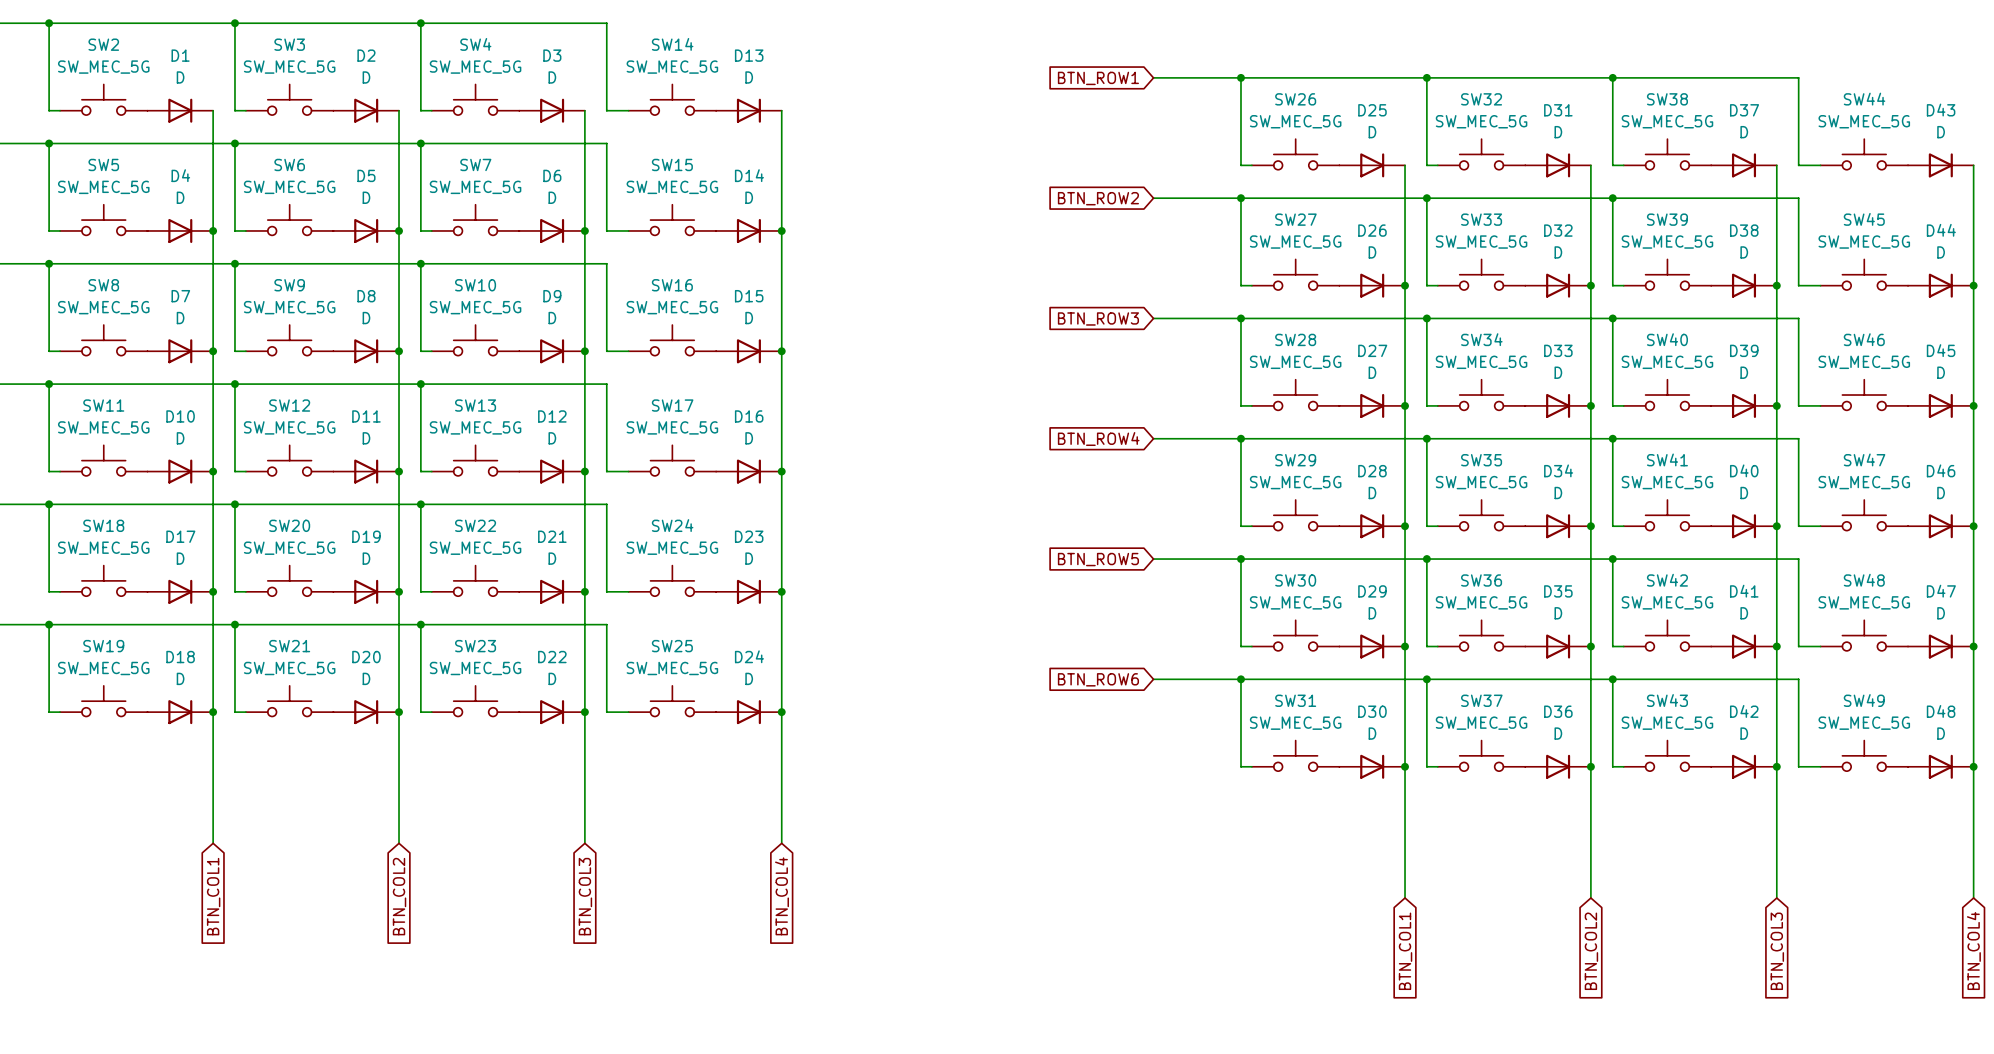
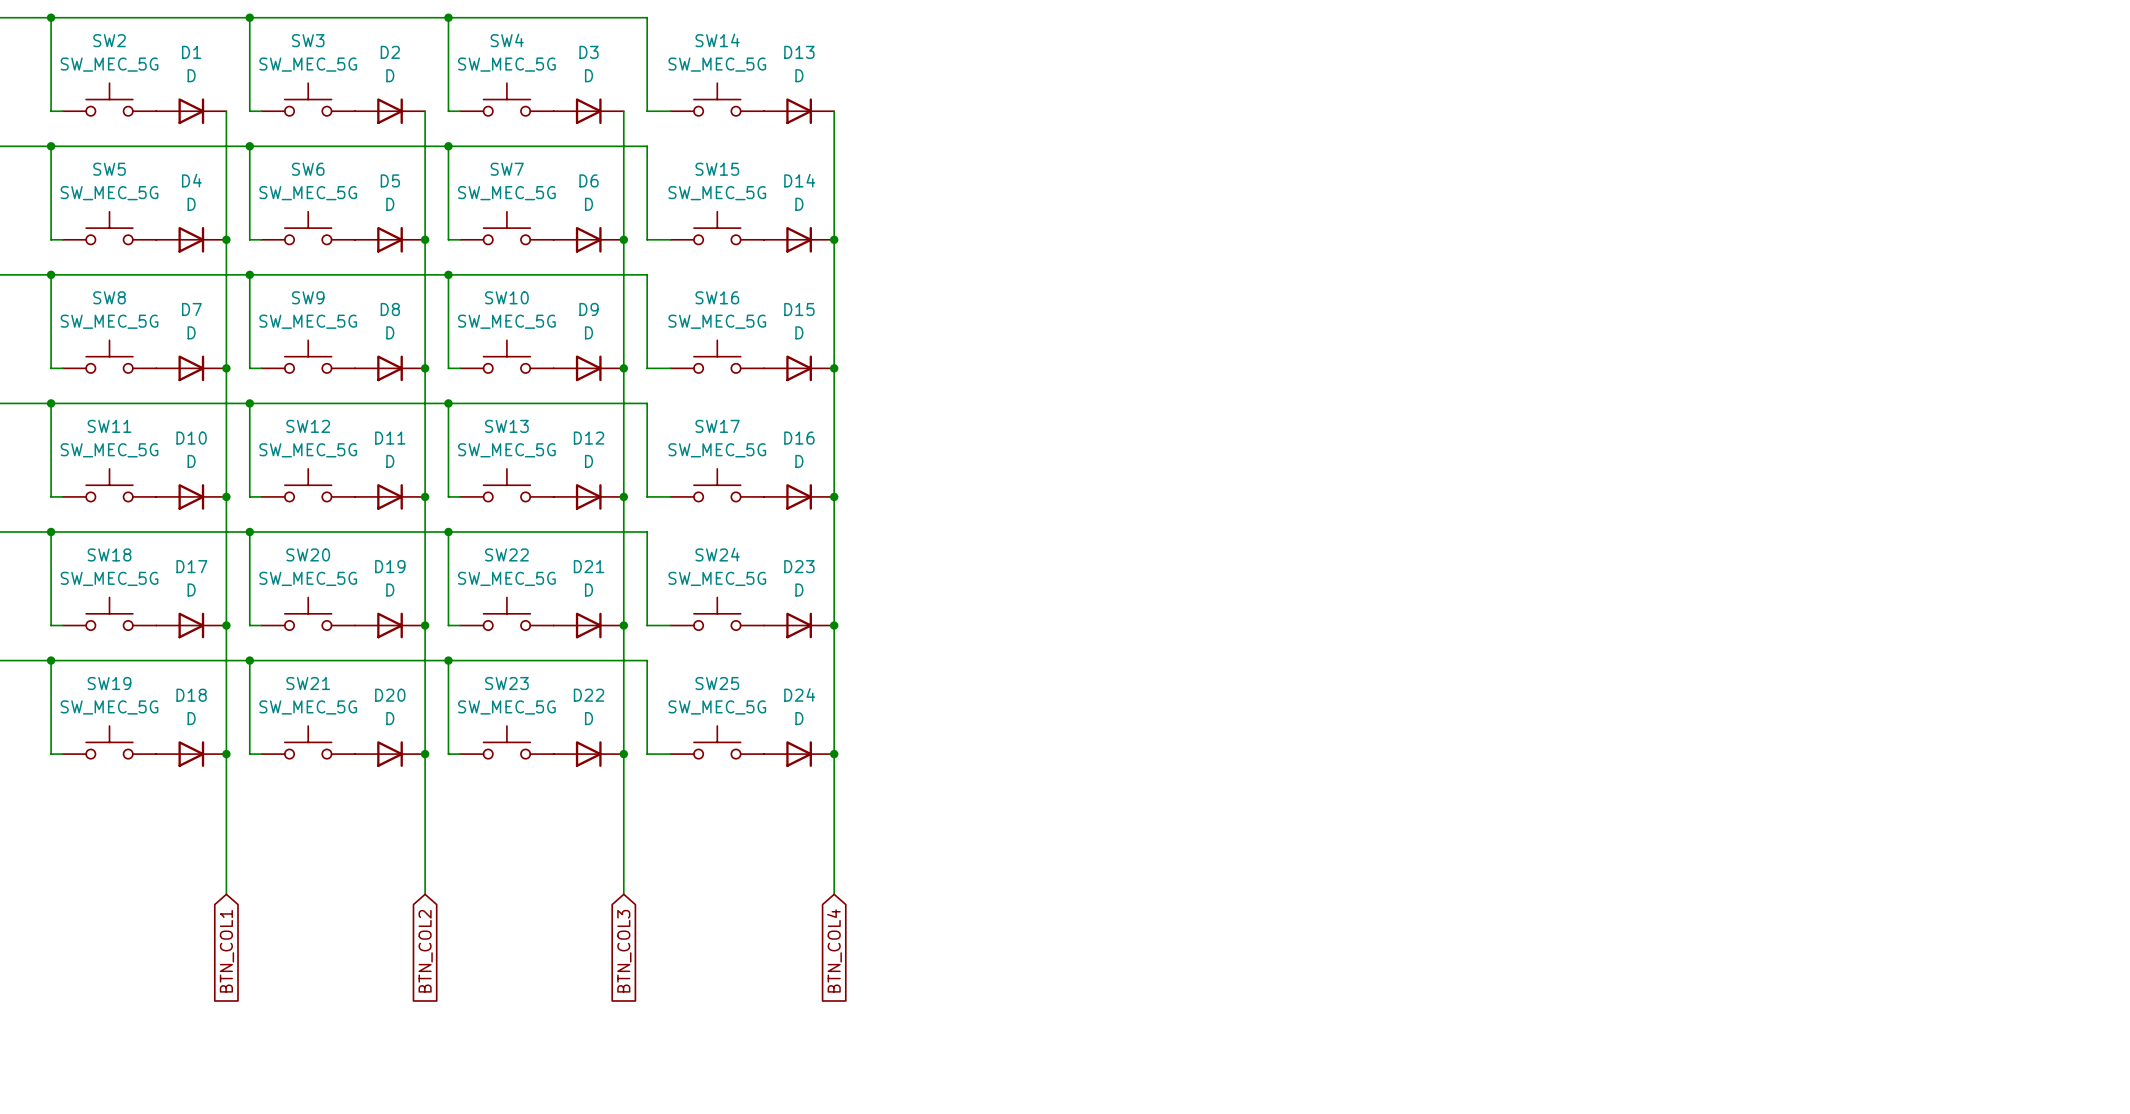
wire: (1153, 77) (1798, 77) (1798, 165) (1820, 165) -> none
wire: (1240, 77) (1240, 165) (1251, 165) -> none
junction: (1240, 77) -> none
wire: (1426, 77) (1426, 165) (1437, 165) -> none
junction: (1426, 77) -> none
wire: (1612, 77) (1612, 165) (1623, 165) -> none
junction: (1612, 77) -> none
global label: BTN_ROW1 (1098, 78) -> none
SW26: SW_MEC_5G (1295, 154) -> none
SW32: SW_MEC_5G (1481, 154) -> none
SW38: SW_MEC_5G (1667, 154) -> none
SW44: SW_MEC_5G (1864, 154) -> none
D25: D (1372, 165) -> none
wire: (1405, 165) (1405, 898) -> none
D31: D (1558, 165) -> none
wire: (1590, 165) (1590, 898) -> none
D37: D (1743, 165) -> none
wire: (1776, 165) (1776, 898) -> none
D43: D (1940, 165) -> none
wire: (1973, 165) (1973, 898) -> none
global label: BTN_ROW2 (1098, 198) -> none
wire: (1153, 198) (1798, 198) (1798, 285) (1820, 285) -> none
wire: (1240, 198) (1240, 285) (1251, 285) -> none
junction: (1240, 198) -> none
wire: (1426, 198) (1426, 285) (1437, 285) -> none
junction: (1426, 198) -> none
wire: (1612, 198) (1612, 285) (1623, 285) -> none
junction: (1612, 198) -> none
SW27: SW_MEC_5G (1295, 274) -> none
SW33: SW_MEC_5G (1481, 274) -> none
SW39: SW_MEC_5G (1667, 274) -> none
SW45: SW_MEC_5G (1864, 274) -> none
D26: D (1372, 285) -> none
junction: (1405, 285) -> none
D32: D (1558, 285) -> none
junction: (1590, 285) -> none
D38: D (1743, 285) -> none
junction: (1776, 285) -> none
D44: D (1940, 285) -> none
junction: (1973, 285) -> none
global label: BTN_ROW3 (1098, 318) -> none
wire: (1153, 318) (1798, 318) (1798, 405) (1820, 405) -> none
wire: (1240, 318) (1240, 405) (1251, 405) -> none
junction: (1240, 318) -> none
wire: (1426, 318) (1426, 405) (1437, 405) -> none
junction: (1426, 318) -> none
wire: (1612, 318) (1612, 405) (1623, 405) -> none
junction: (1612, 318) -> none
SW28: SW_MEC_5G (1295, 395) -> none
SW34: SW_MEC_5G (1481, 395) -> none
SW40: SW_MEC_5G (1667, 395) -> none
SW46: SW_MEC_5G (1864, 395) -> none
D27: D (1372, 405) -> none
junction: (1405, 405) -> none
D33: D (1558, 405) -> none
junction: (1590, 405) -> none
D39: D (1743, 405) -> none
junction: (1776, 405) -> none
D45: D (1940, 405) -> none
junction: (1973, 405) -> none
wire: (1153, 438) (1798, 438) (1798, 526) (1820, 526) -> none
wire: (1240, 438) (1240, 526) (1251, 526) -> none
junction: (1240, 438) -> none
wire: (1426, 438) (1426, 526) (1437, 526) -> none
junction: (1426, 438) -> none
wire: (1612, 438) (1612, 526) (1623, 526) -> none
junction: (1612, 438) -> none
global label: BTN_ROW4 (1098, 439) -> none
SW29: SW_MEC_5G (1295, 515) -> none
SW35: SW_MEC_5G (1481, 515) -> none
SW41: SW_MEC_5G (1667, 515) -> none
SW47: SW_MEC_5G (1864, 515) -> none
D28: D (1372, 526) -> none
junction: (1405, 526) -> none
D34: D (1558, 526) -> none
junction: (1590, 526) -> none
D40: D (1743, 526) -> none
junction: (1776, 526) -> none
D46: D (1940, 526) -> none
junction: (1973, 526) -> none
global label: BTN_ROW5 (1098, 559) -> none
wire: (1153, 559) (1798, 559) (1798, 646) (1820, 646) -> none
wire: (1240, 559) (1240, 646) (1251, 646) -> none
junction: (1240, 559) -> none
wire: (1426, 559) (1426, 646) (1437, 646) -> none
junction: (1426, 559) -> none
wire: (1612, 559) (1612, 646) (1623, 646) -> none
junction: (1612, 559) -> none
SW30: SW_MEC_5G (1295, 635) -> none
SW36: SW_MEC_5G (1481, 635) -> none
SW42: SW_MEC_5G (1667, 635) -> none
SW48: SW_MEC_5G (1864, 635) -> none
D29: D (1372, 646) -> none
junction: (1405, 646) -> none
D35: D (1558, 646) -> none
junction: (1590, 646) -> none
D41: D (1743, 646) -> none
junction: (1776, 646) -> none
D47: D (1940, 646) -> none
junction: (1973, 646) -> none
global label: BTN_ROW6 (1098, 679) -> none
wire: (1153, 679) (1798, 679) (1798, 766) (1820, 766) -> none
wire: (1240, 679) (1240, 766) (1251, 766) -> none
junction: (1240, 679) -> none
wire: (1426, 679) (1426, 766) (1437, 766) -> none
junction: (1426, 679) -> none
wire: (1612, 679) (1612, 766) (1623, 766) -> none
junction: (1612, 679) -> none
SW31: SW_MEC_5G (1295, 755) -> none
SW37: SW_MEC_5G (1481, 755) -> none
SW43: SW_MEC_5G (1667, 755) -> none
SW49: SW_MEC_5G (1864, 755) -> none
D30: D (1372, 766) -> none
junction: (1405, 766) -> none
D36: D (1558, 766) -> none
junction: (1590, 766) -> none
D42: D (1743, 766) -> none
junction: (1776, 766) -> none
D48: D (1940, 766) -> none
junction: (1973, 766) -> none
global label: BTN_COL1 (1405, 951) -> none
global label: BTN_COL2 (1591, 951) -> none
global label: BTN_COL3 (1777, 951) -> none
global label: BTN_COL4 (1973, 951) -> none

